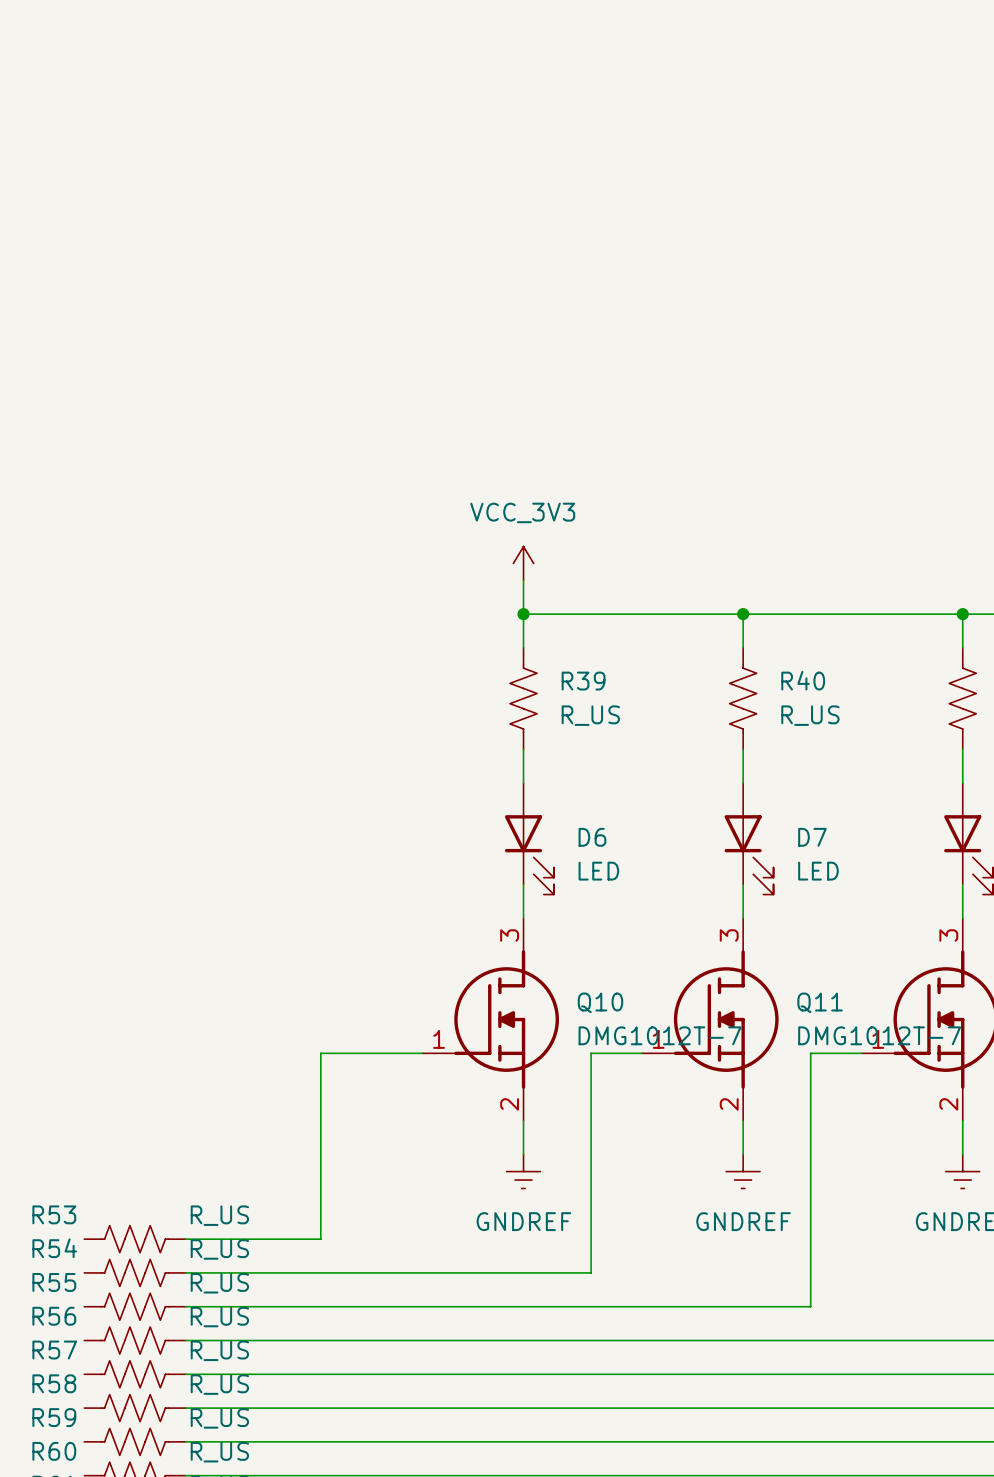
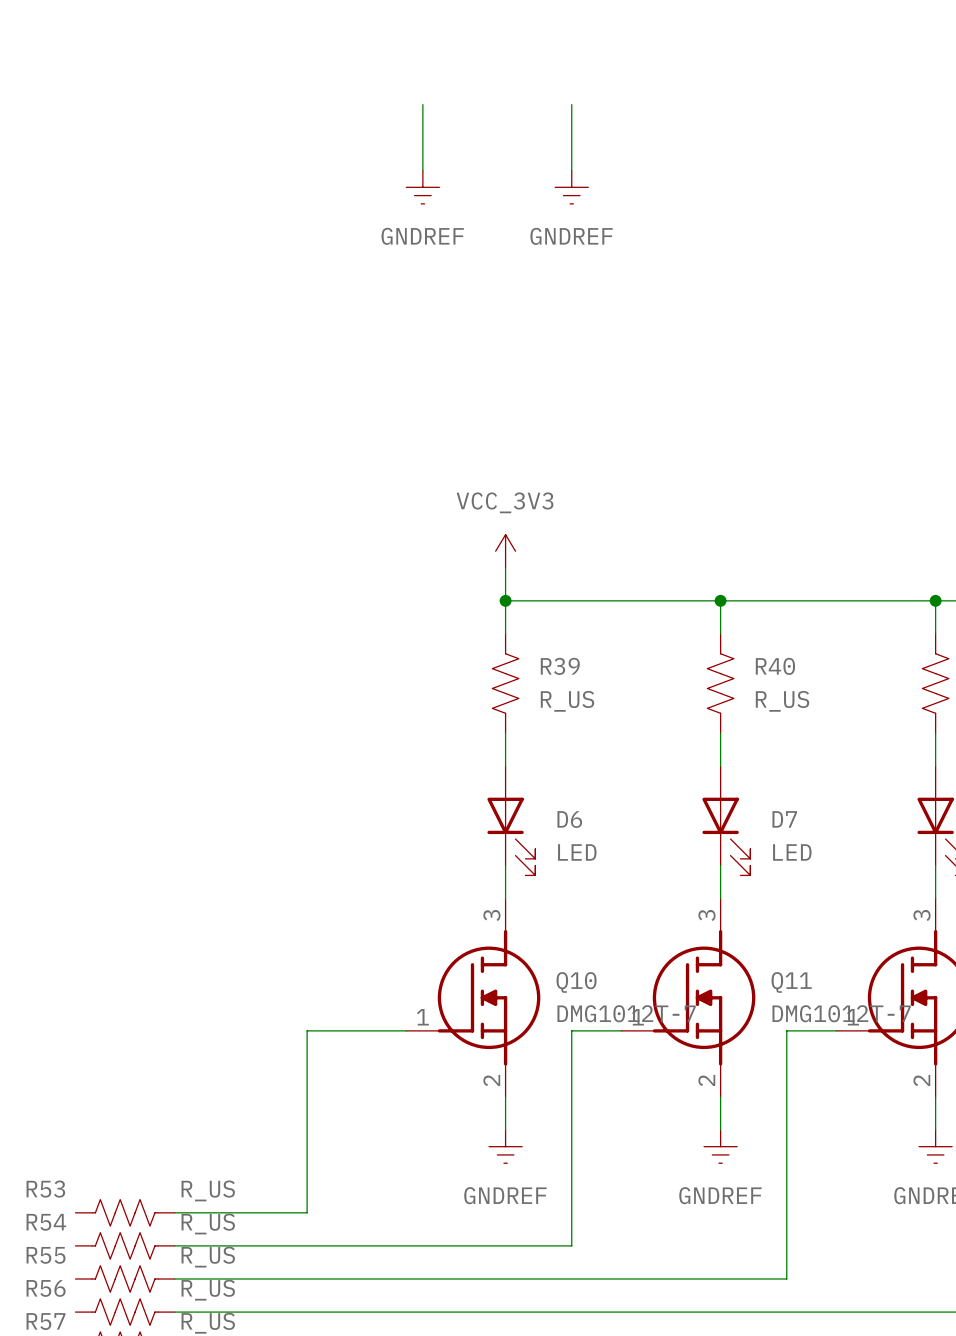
wire: none -> (422, 104) (422, 170)
wire: none -> (571, 104) (571, 170)
power symbol: none -> GNDREF (422, 187)
power symbol: none -> GNDREF (571, 187)

